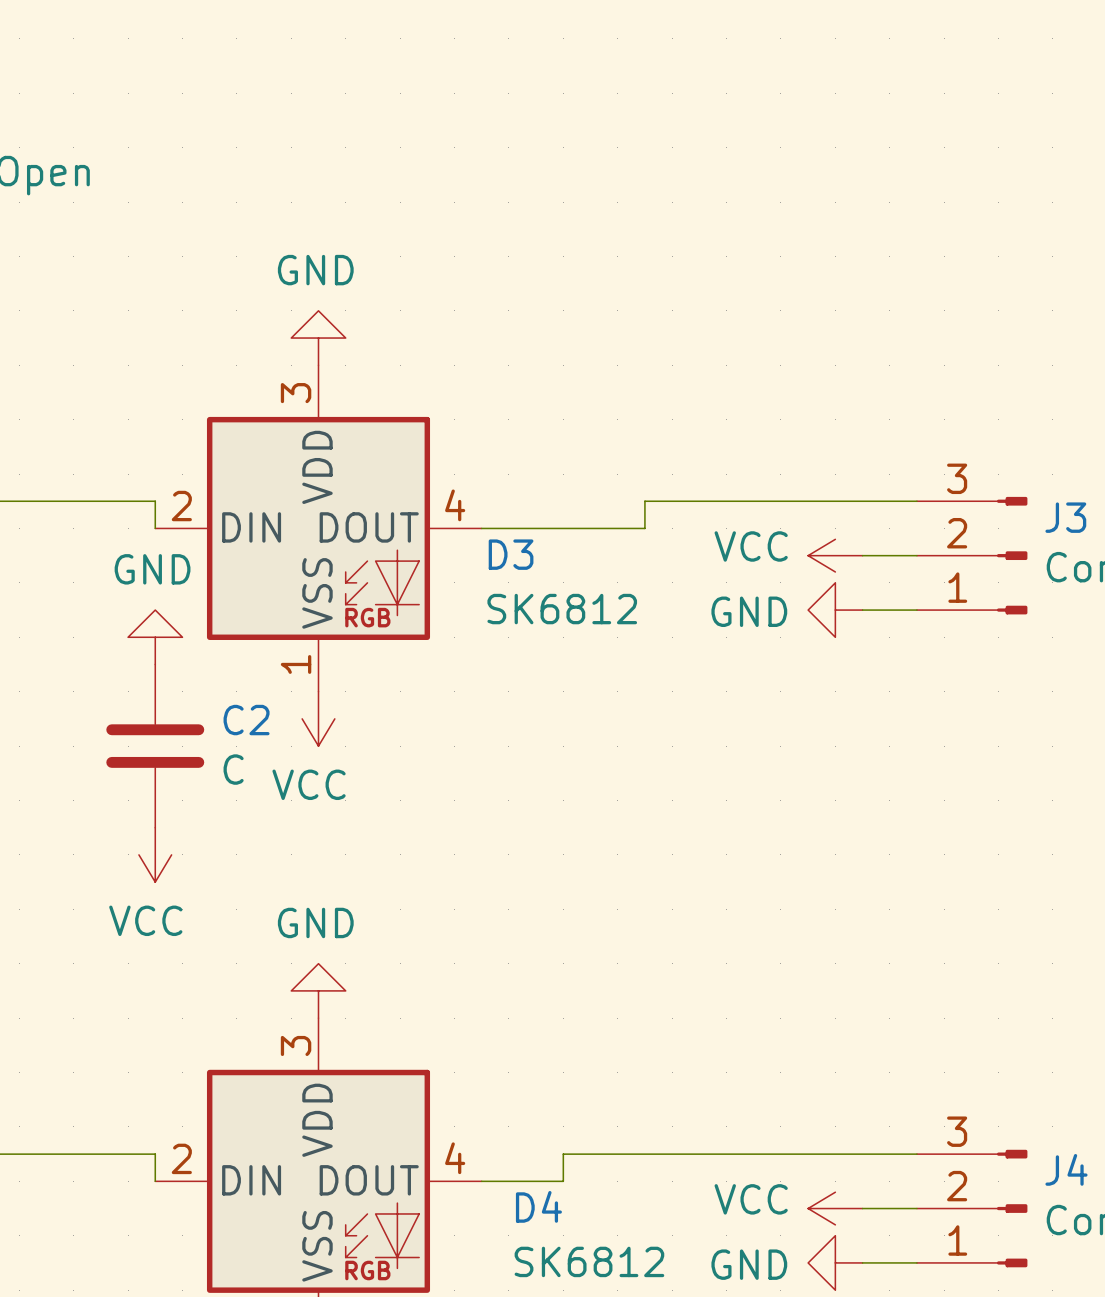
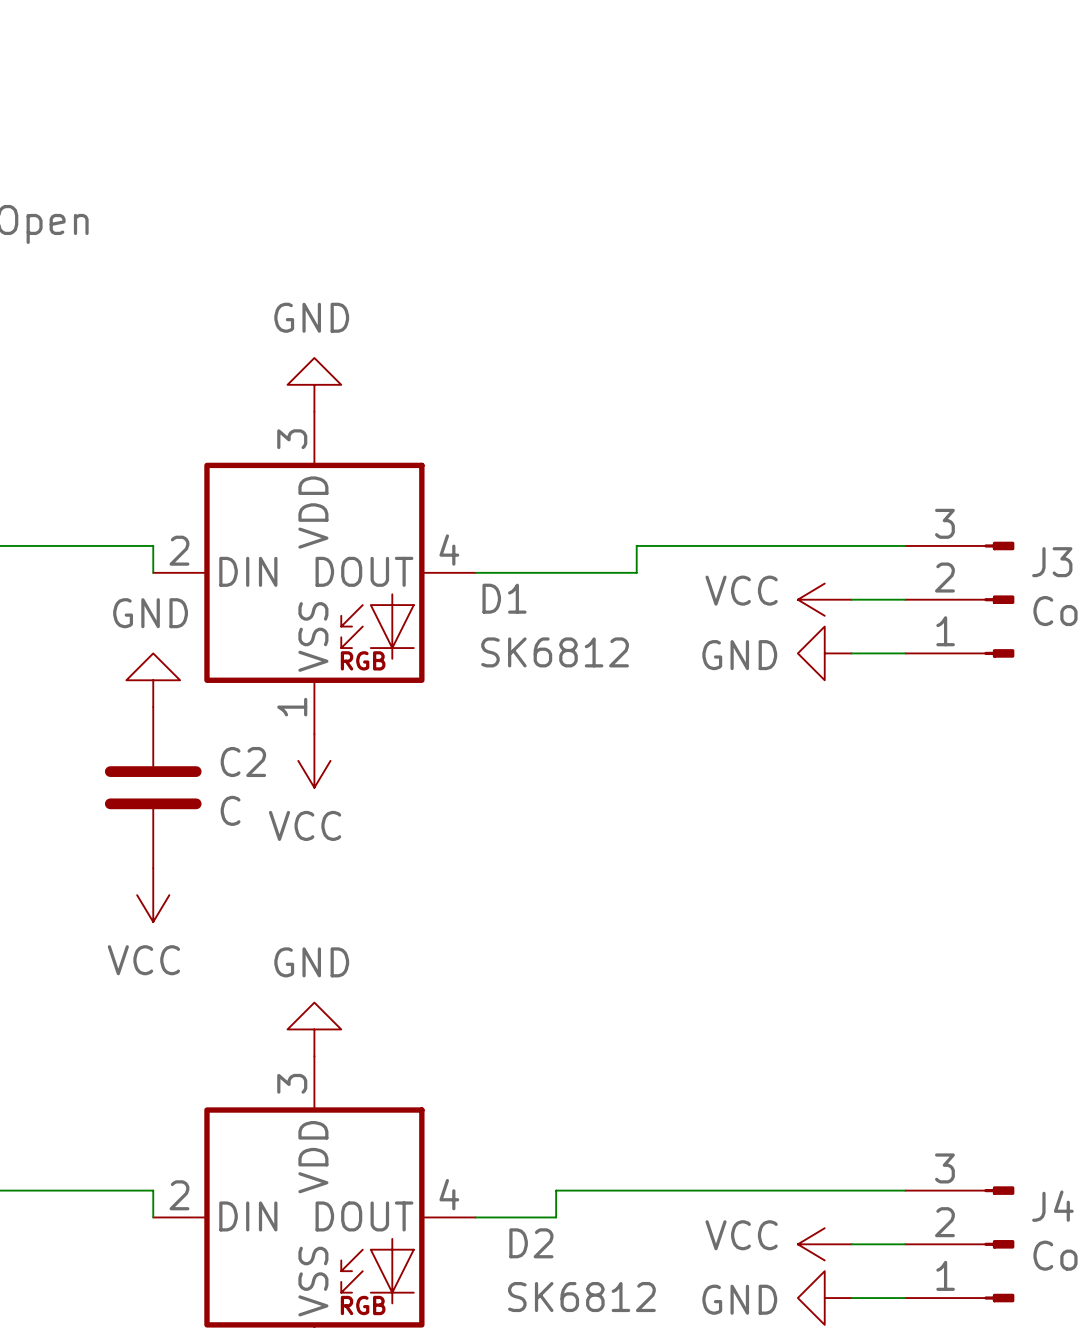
D3 name: D3 (511, 554) -> D1 (504, 598)
D4 name: D4 (538, 1206) -> D2 (531, 1243)

